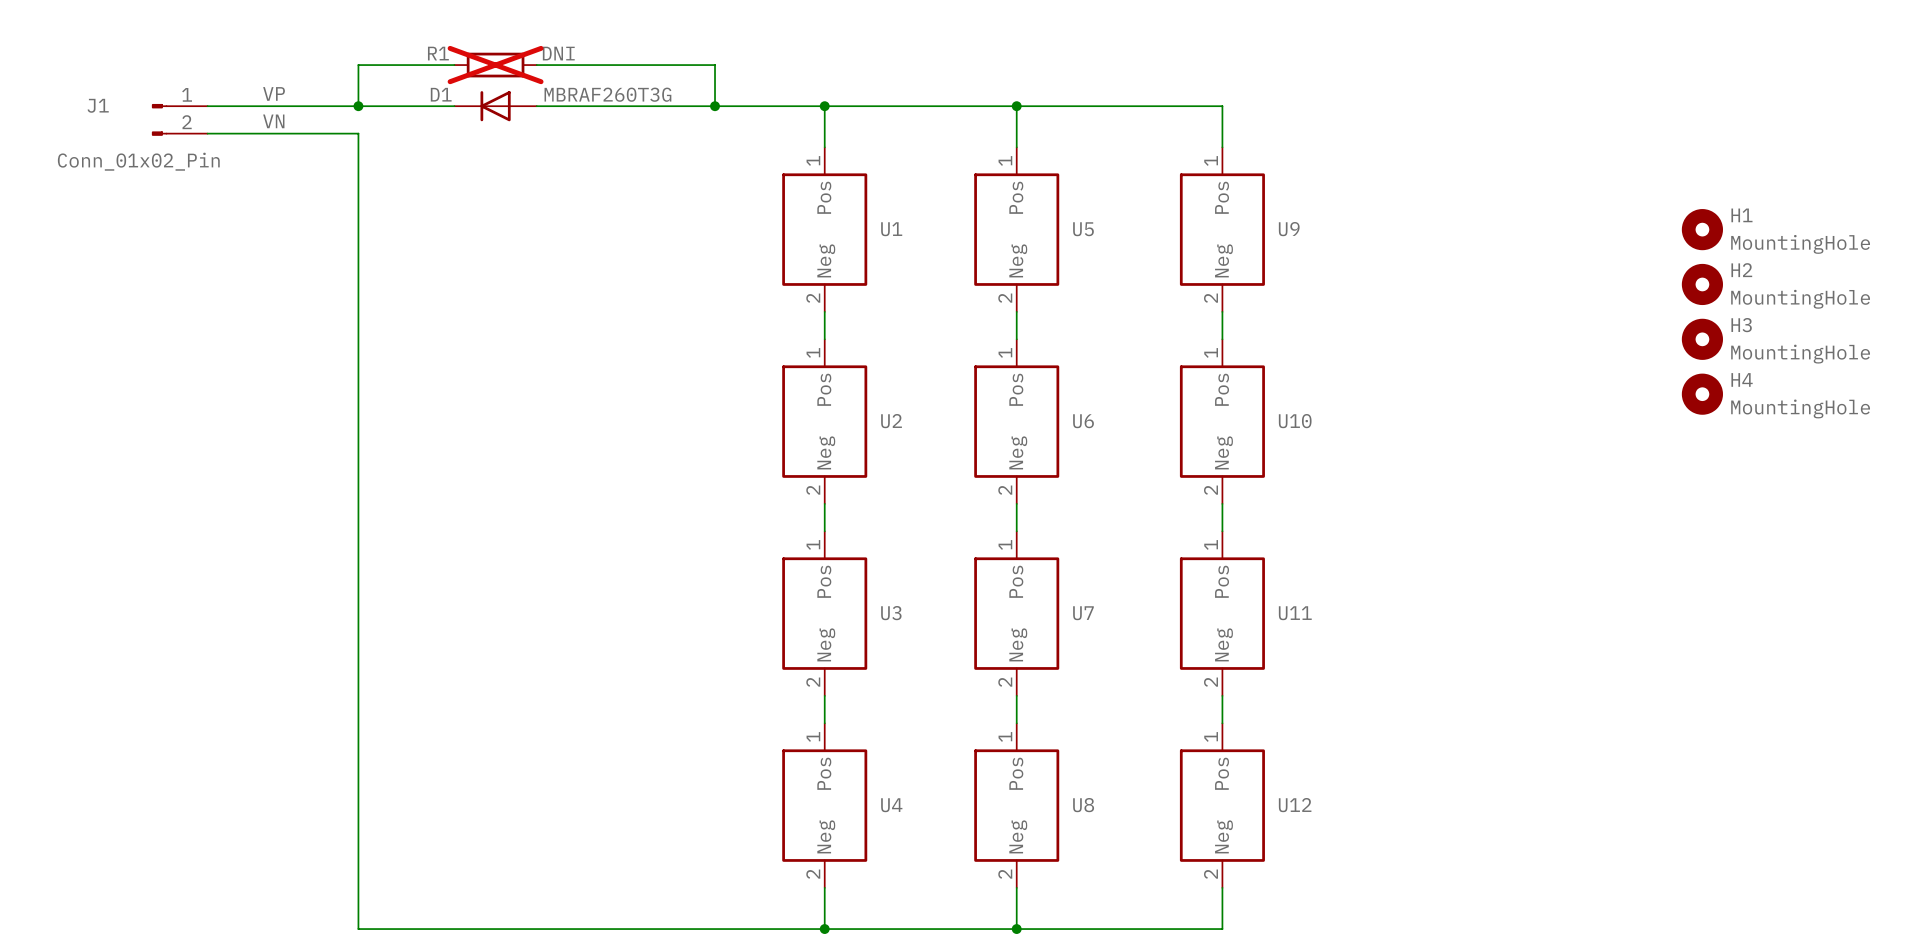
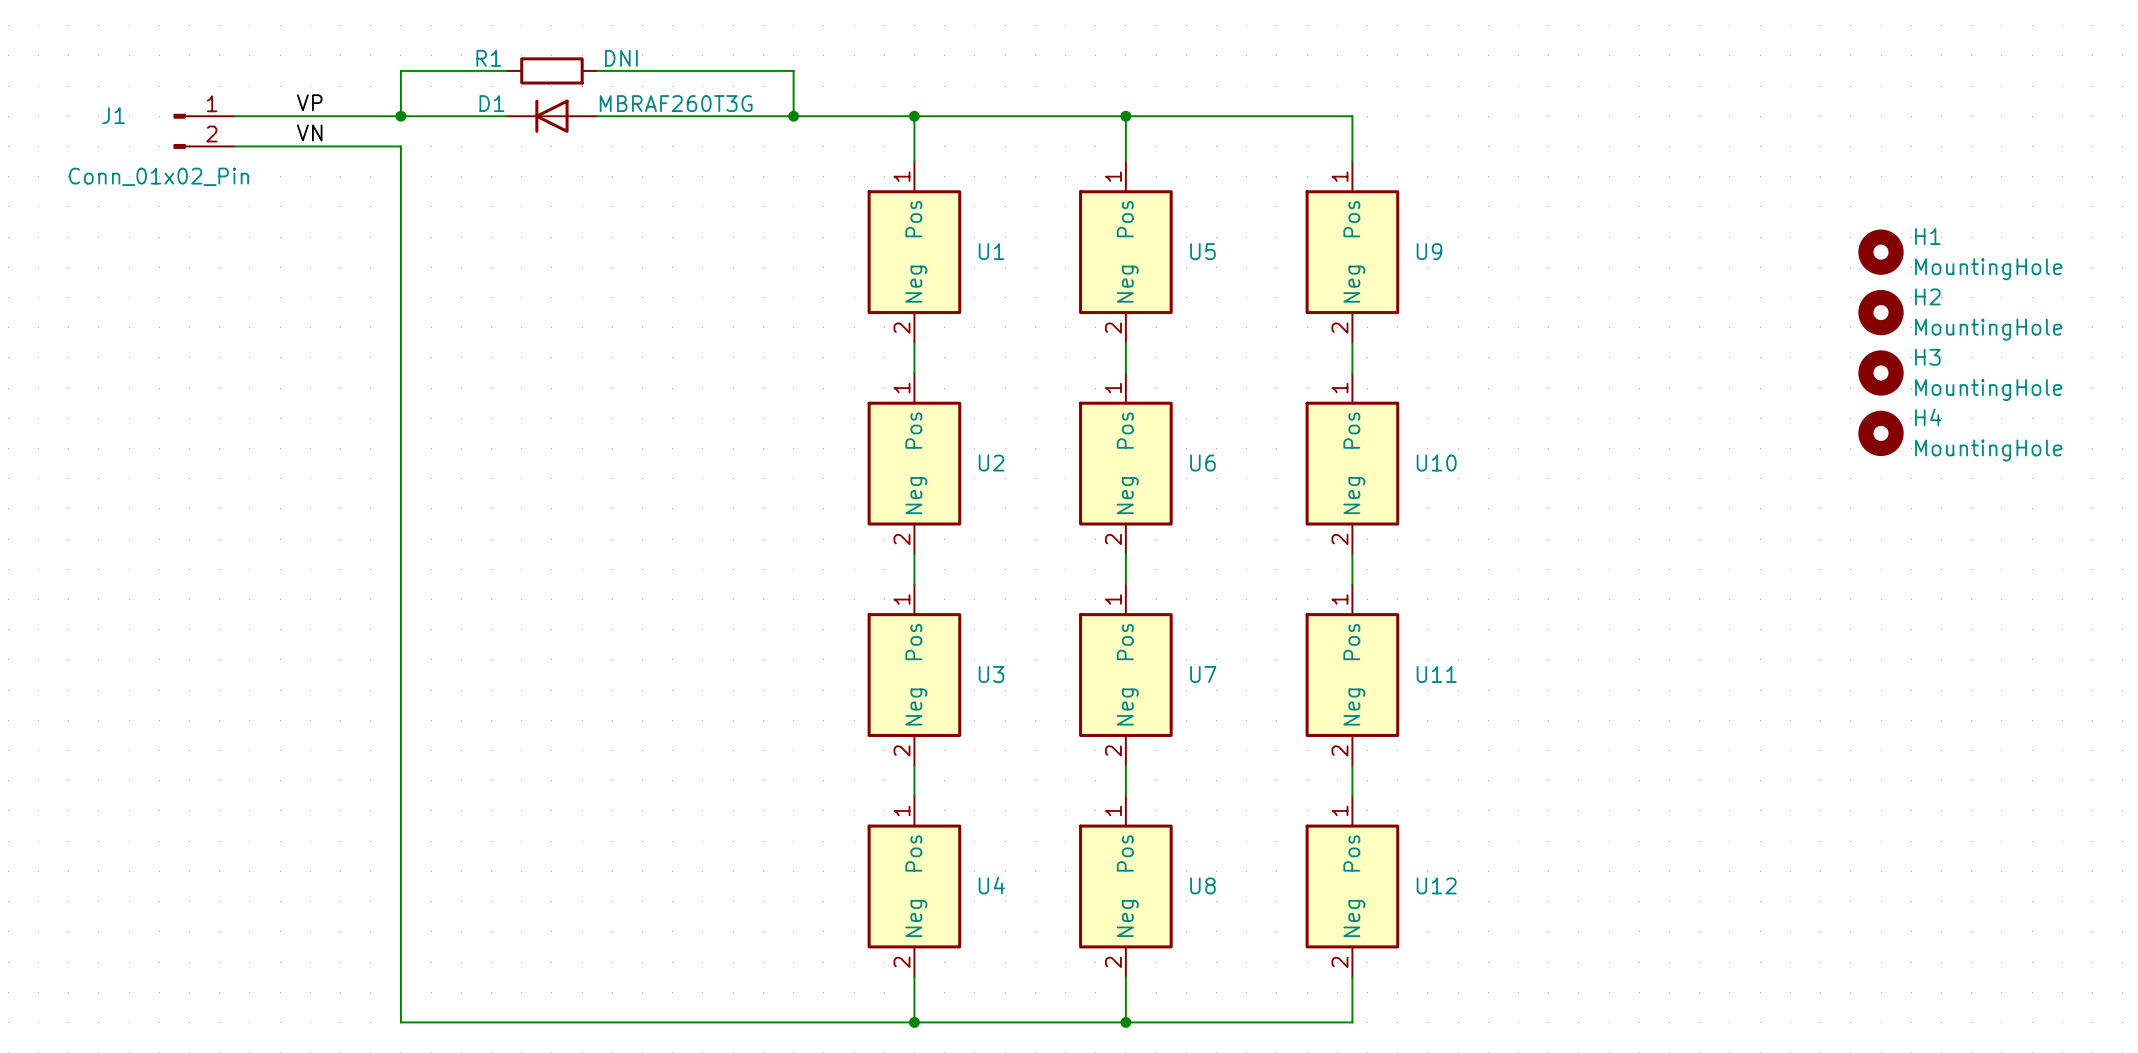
R1 do-not-place cross: (495, 65) -> none

